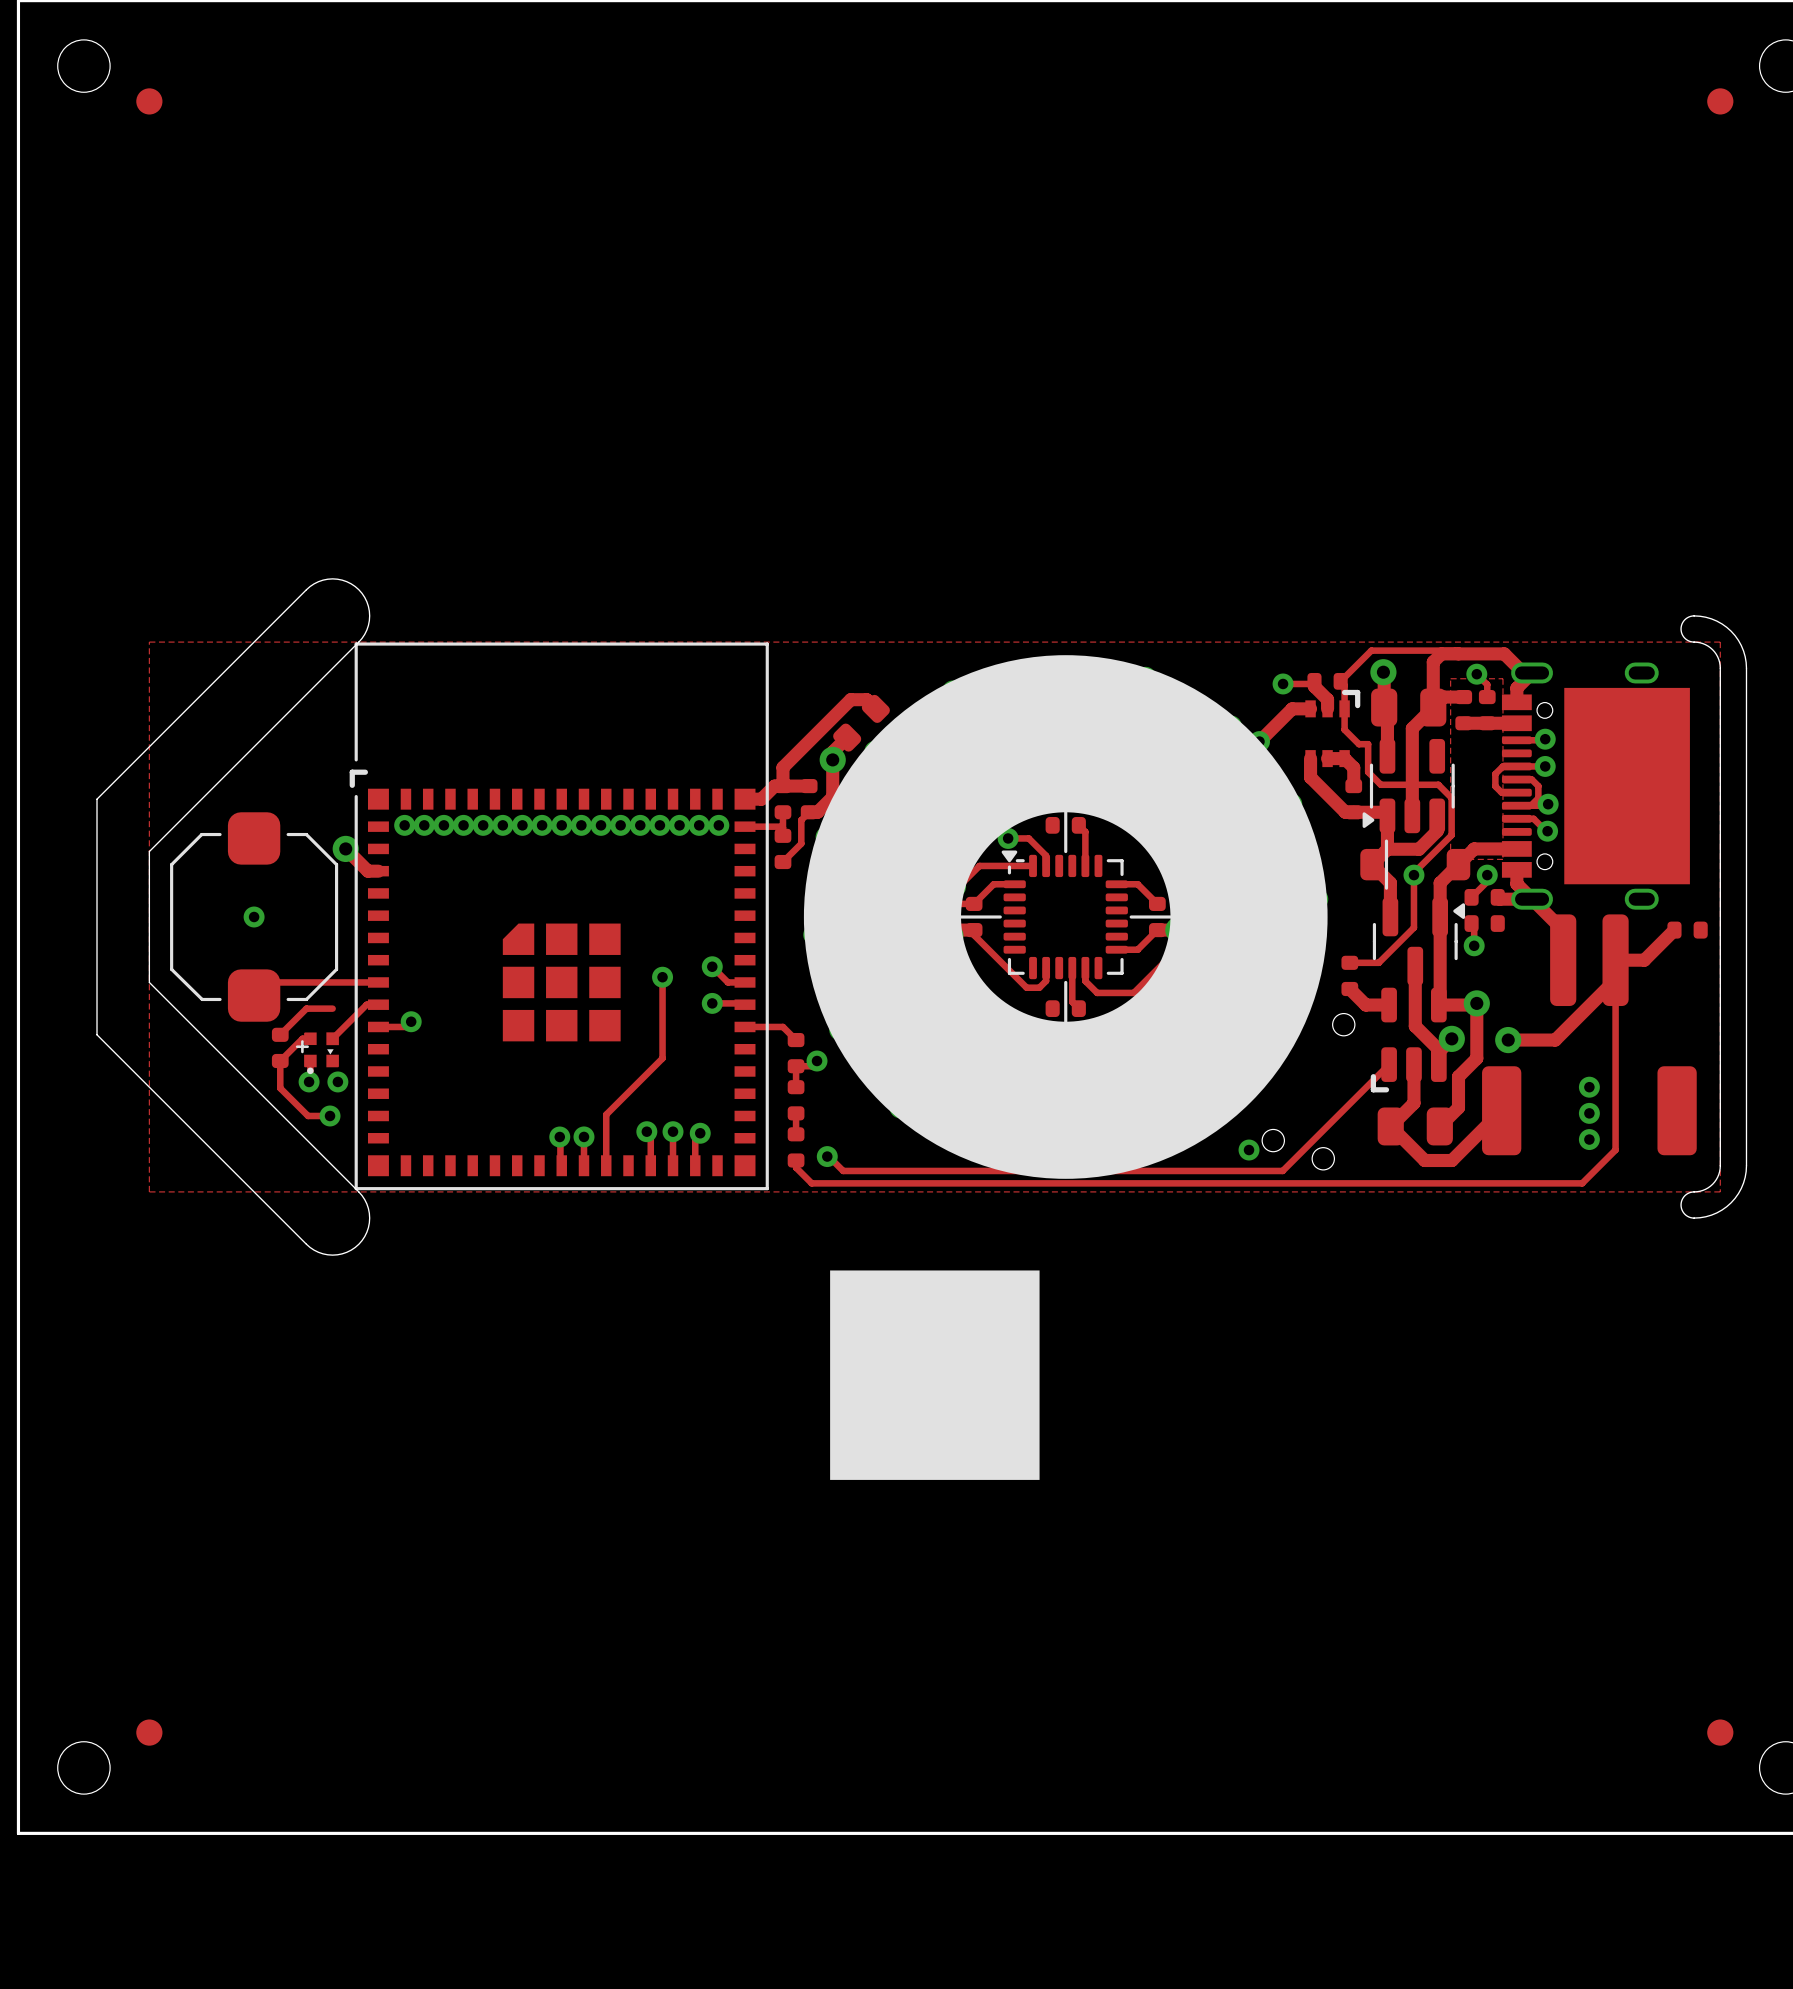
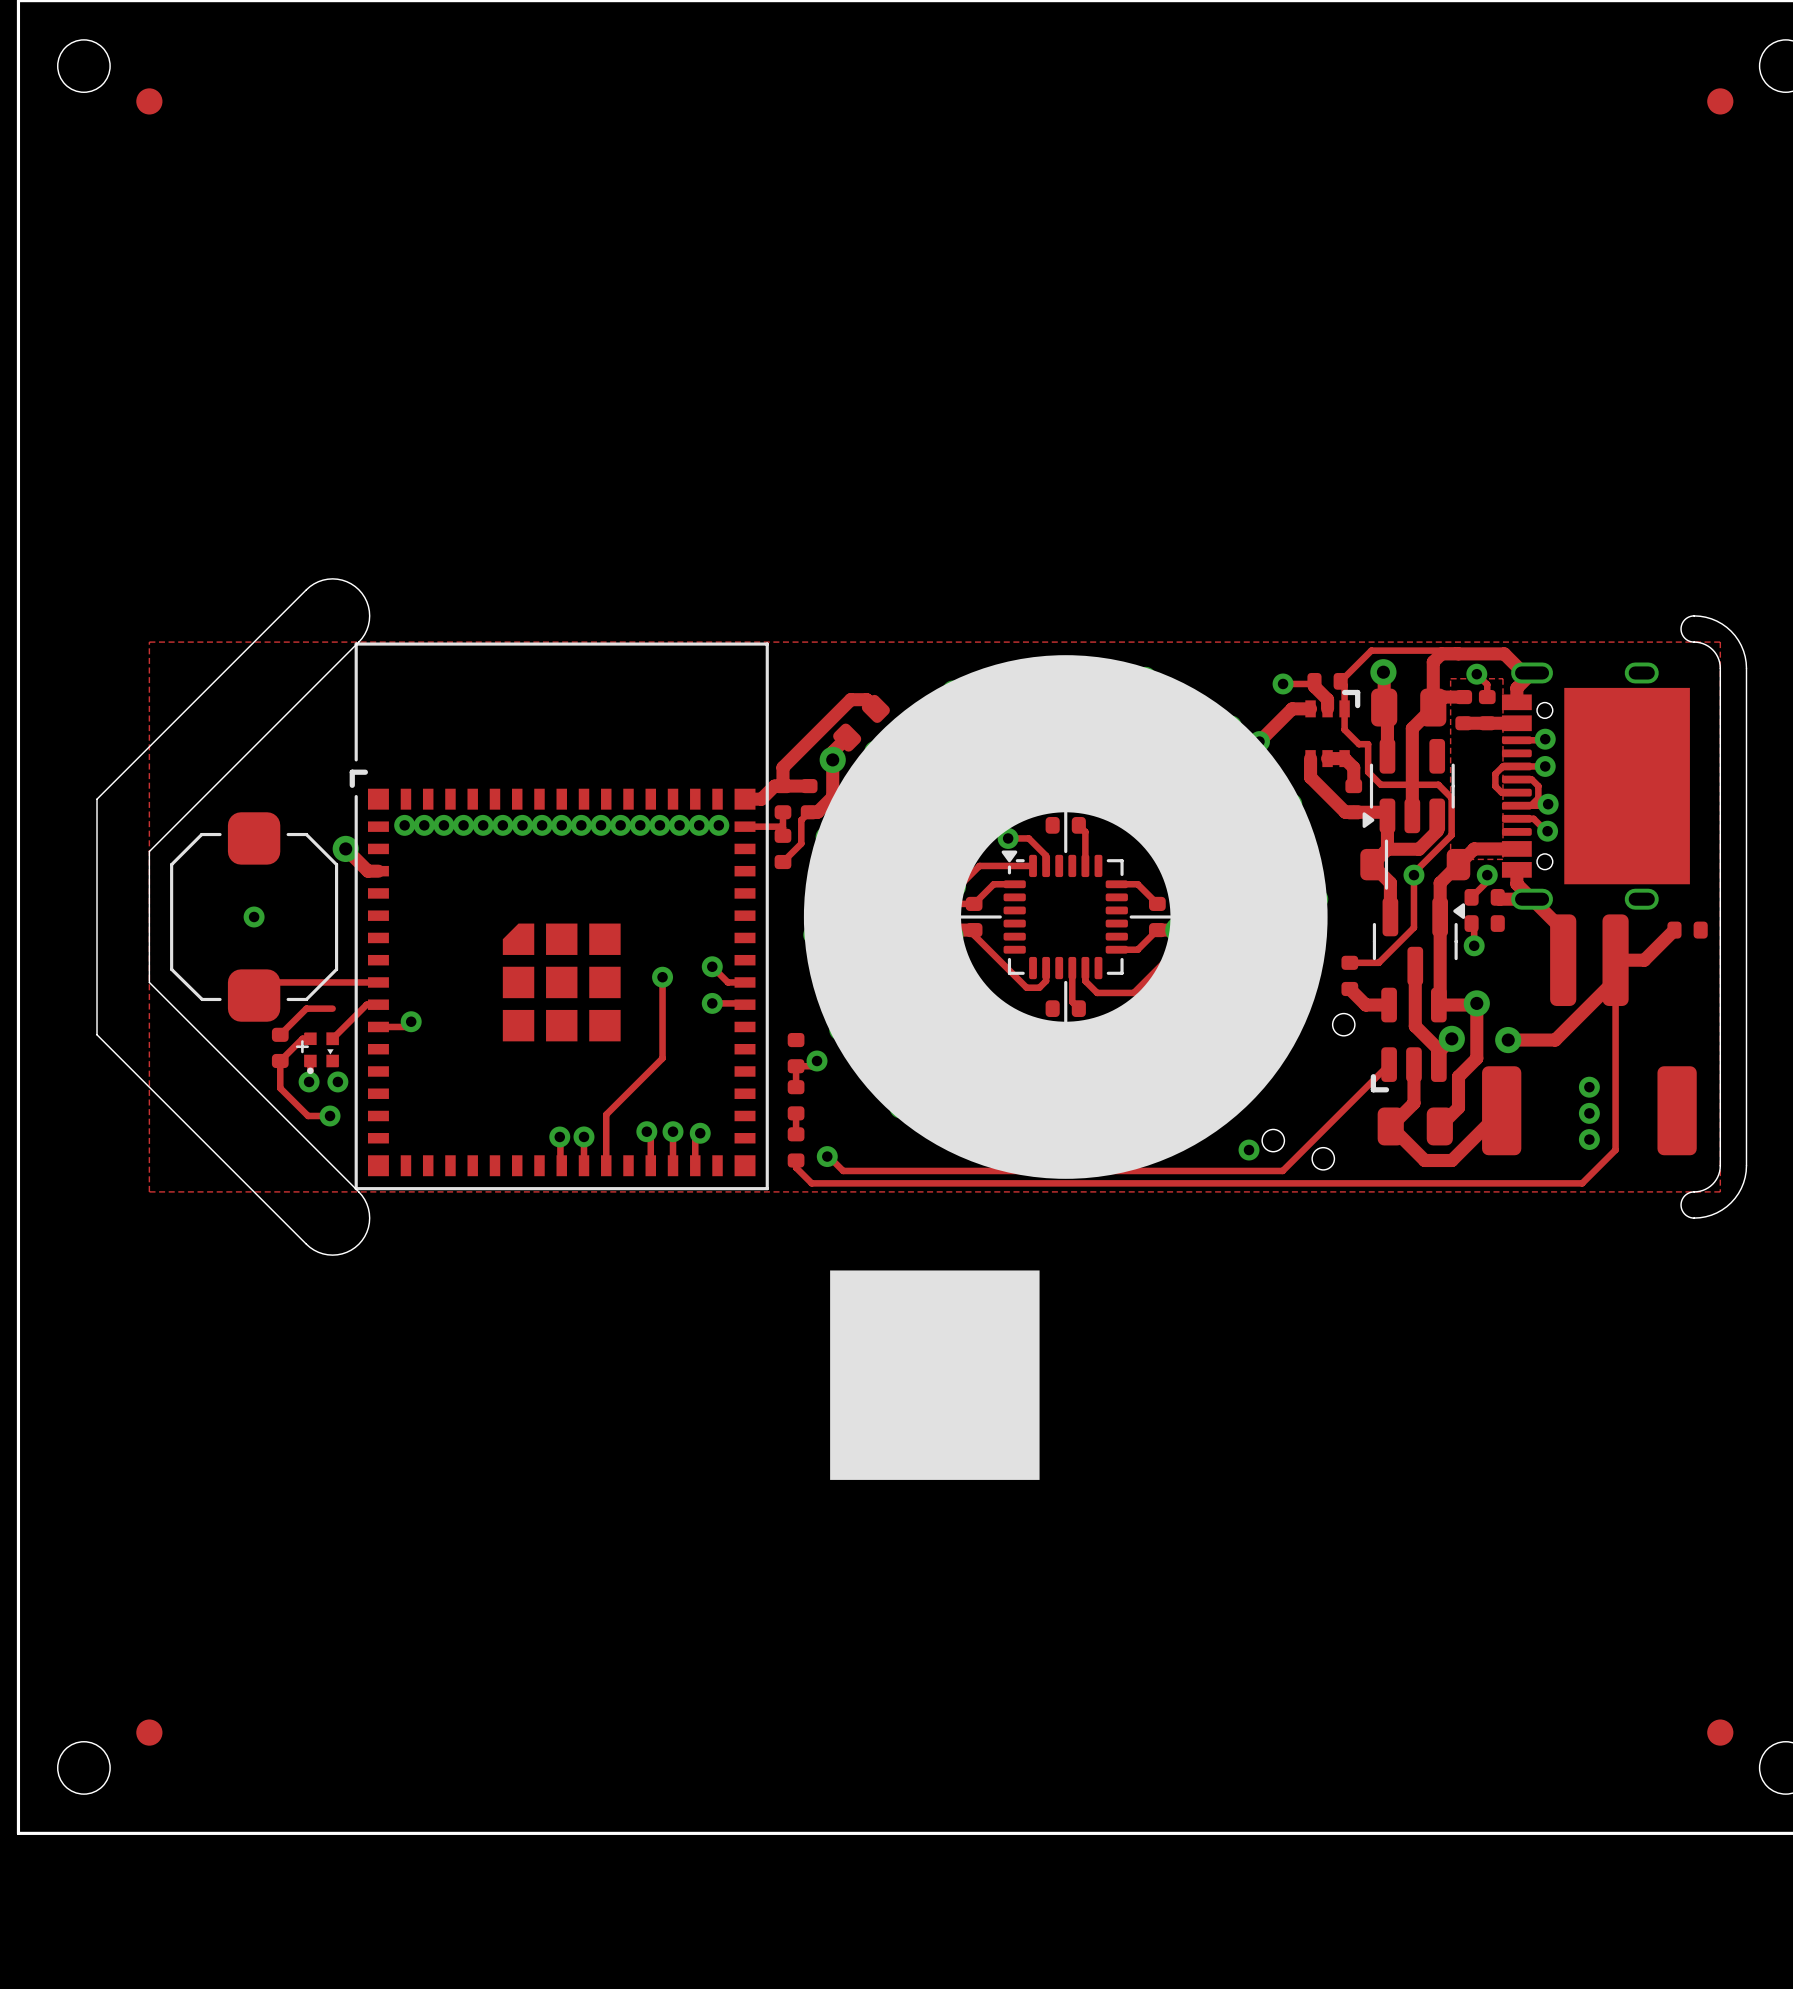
track: (745, 1026) (782, 1026) (796, 1040) -> none

